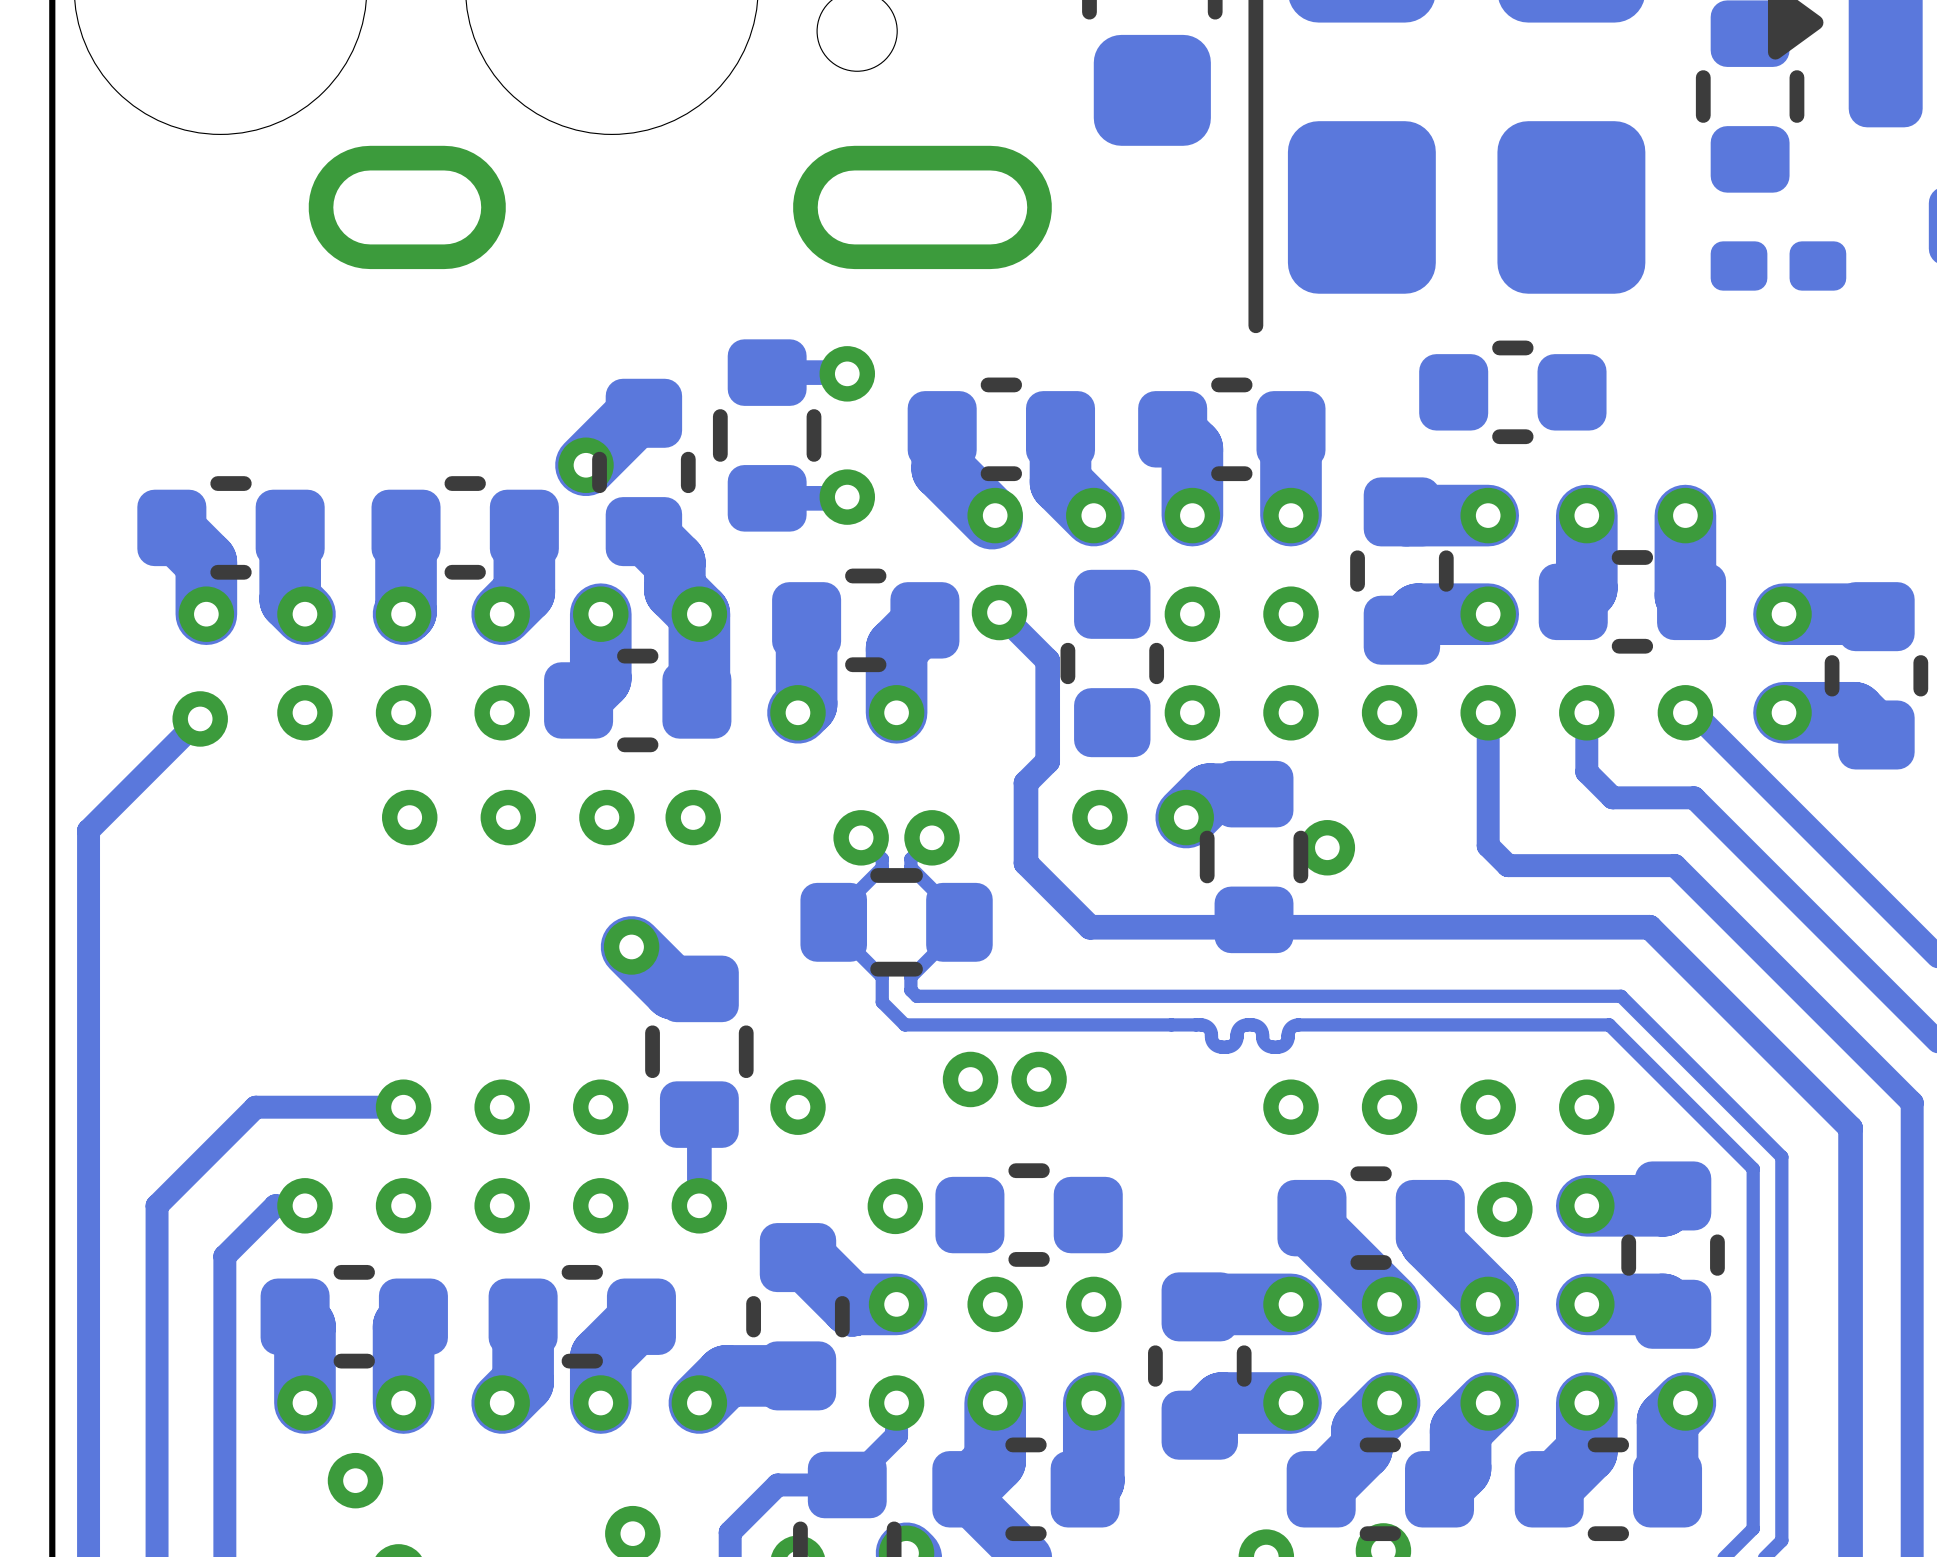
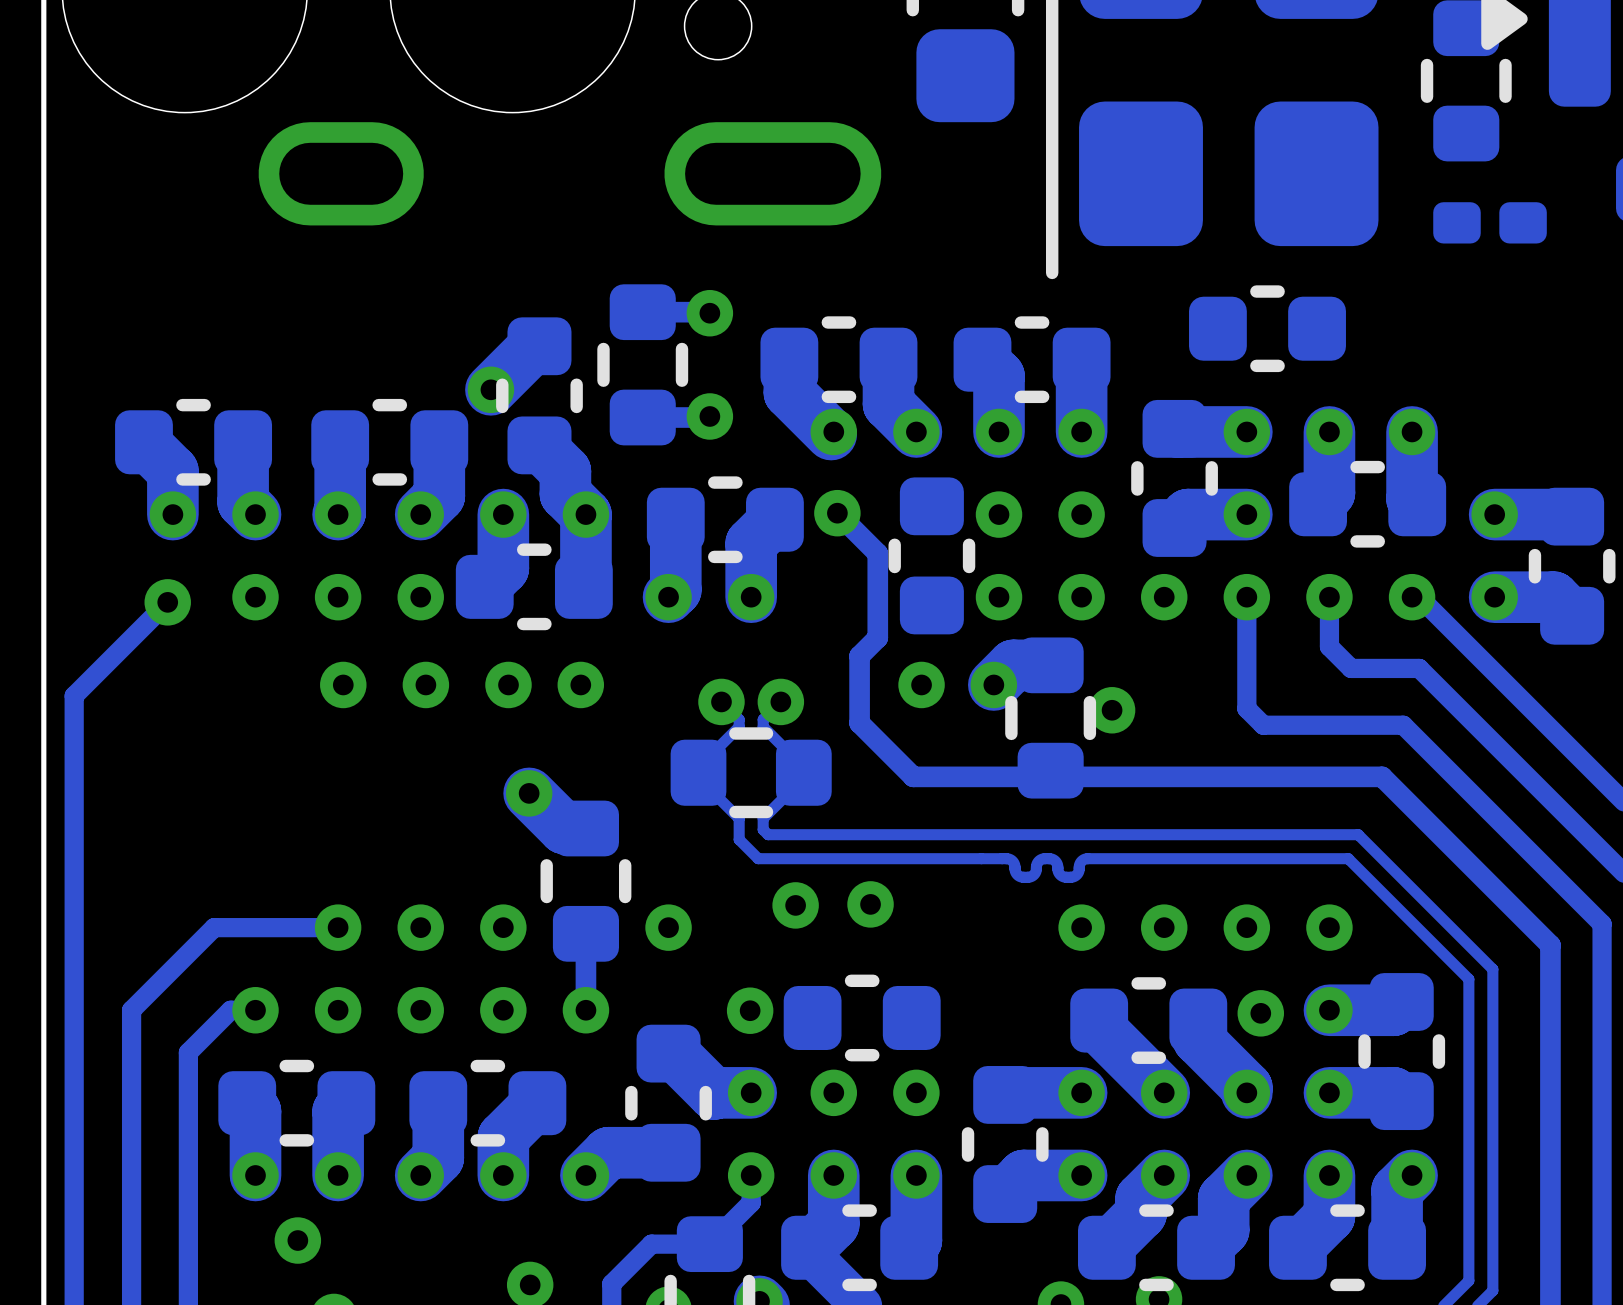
via position: (970, 1079) -> (795, 905)

